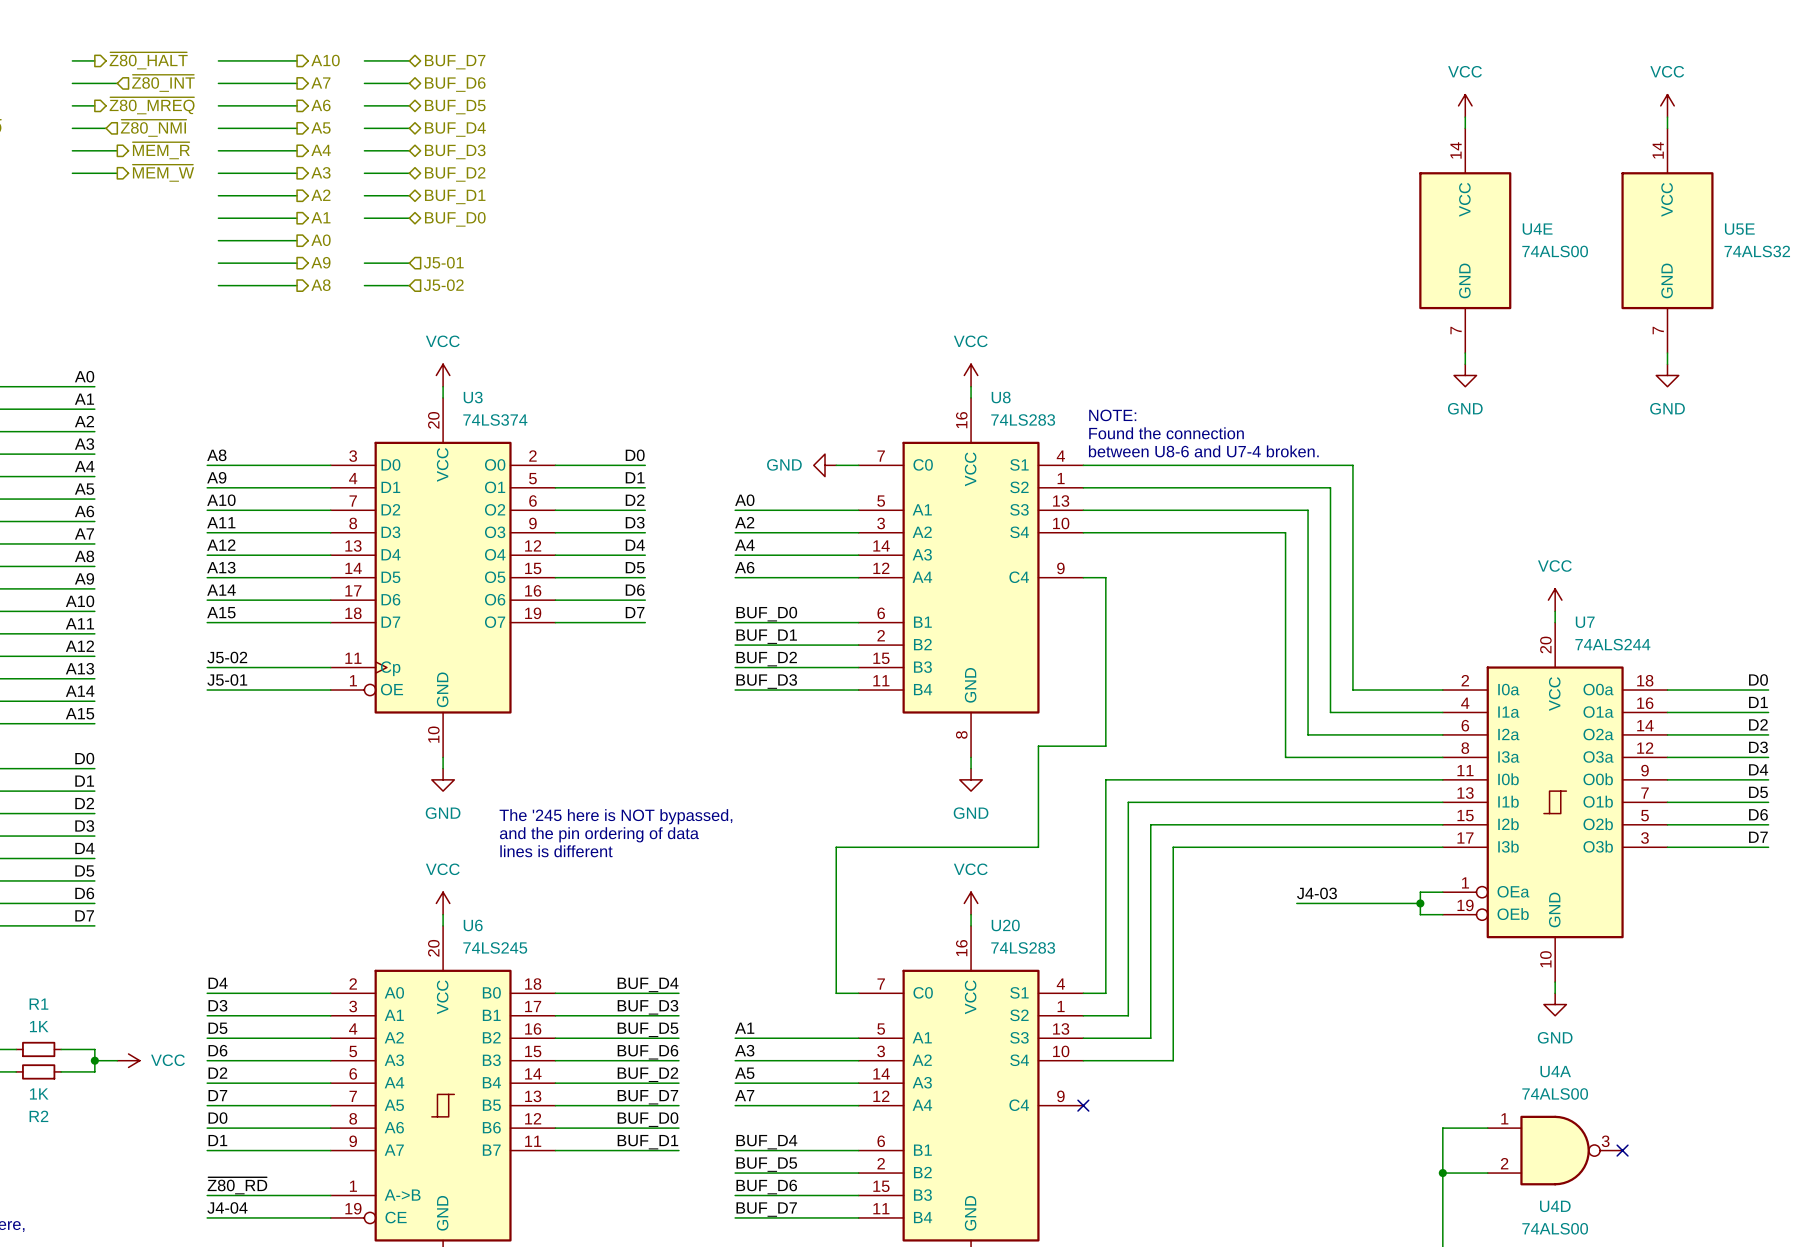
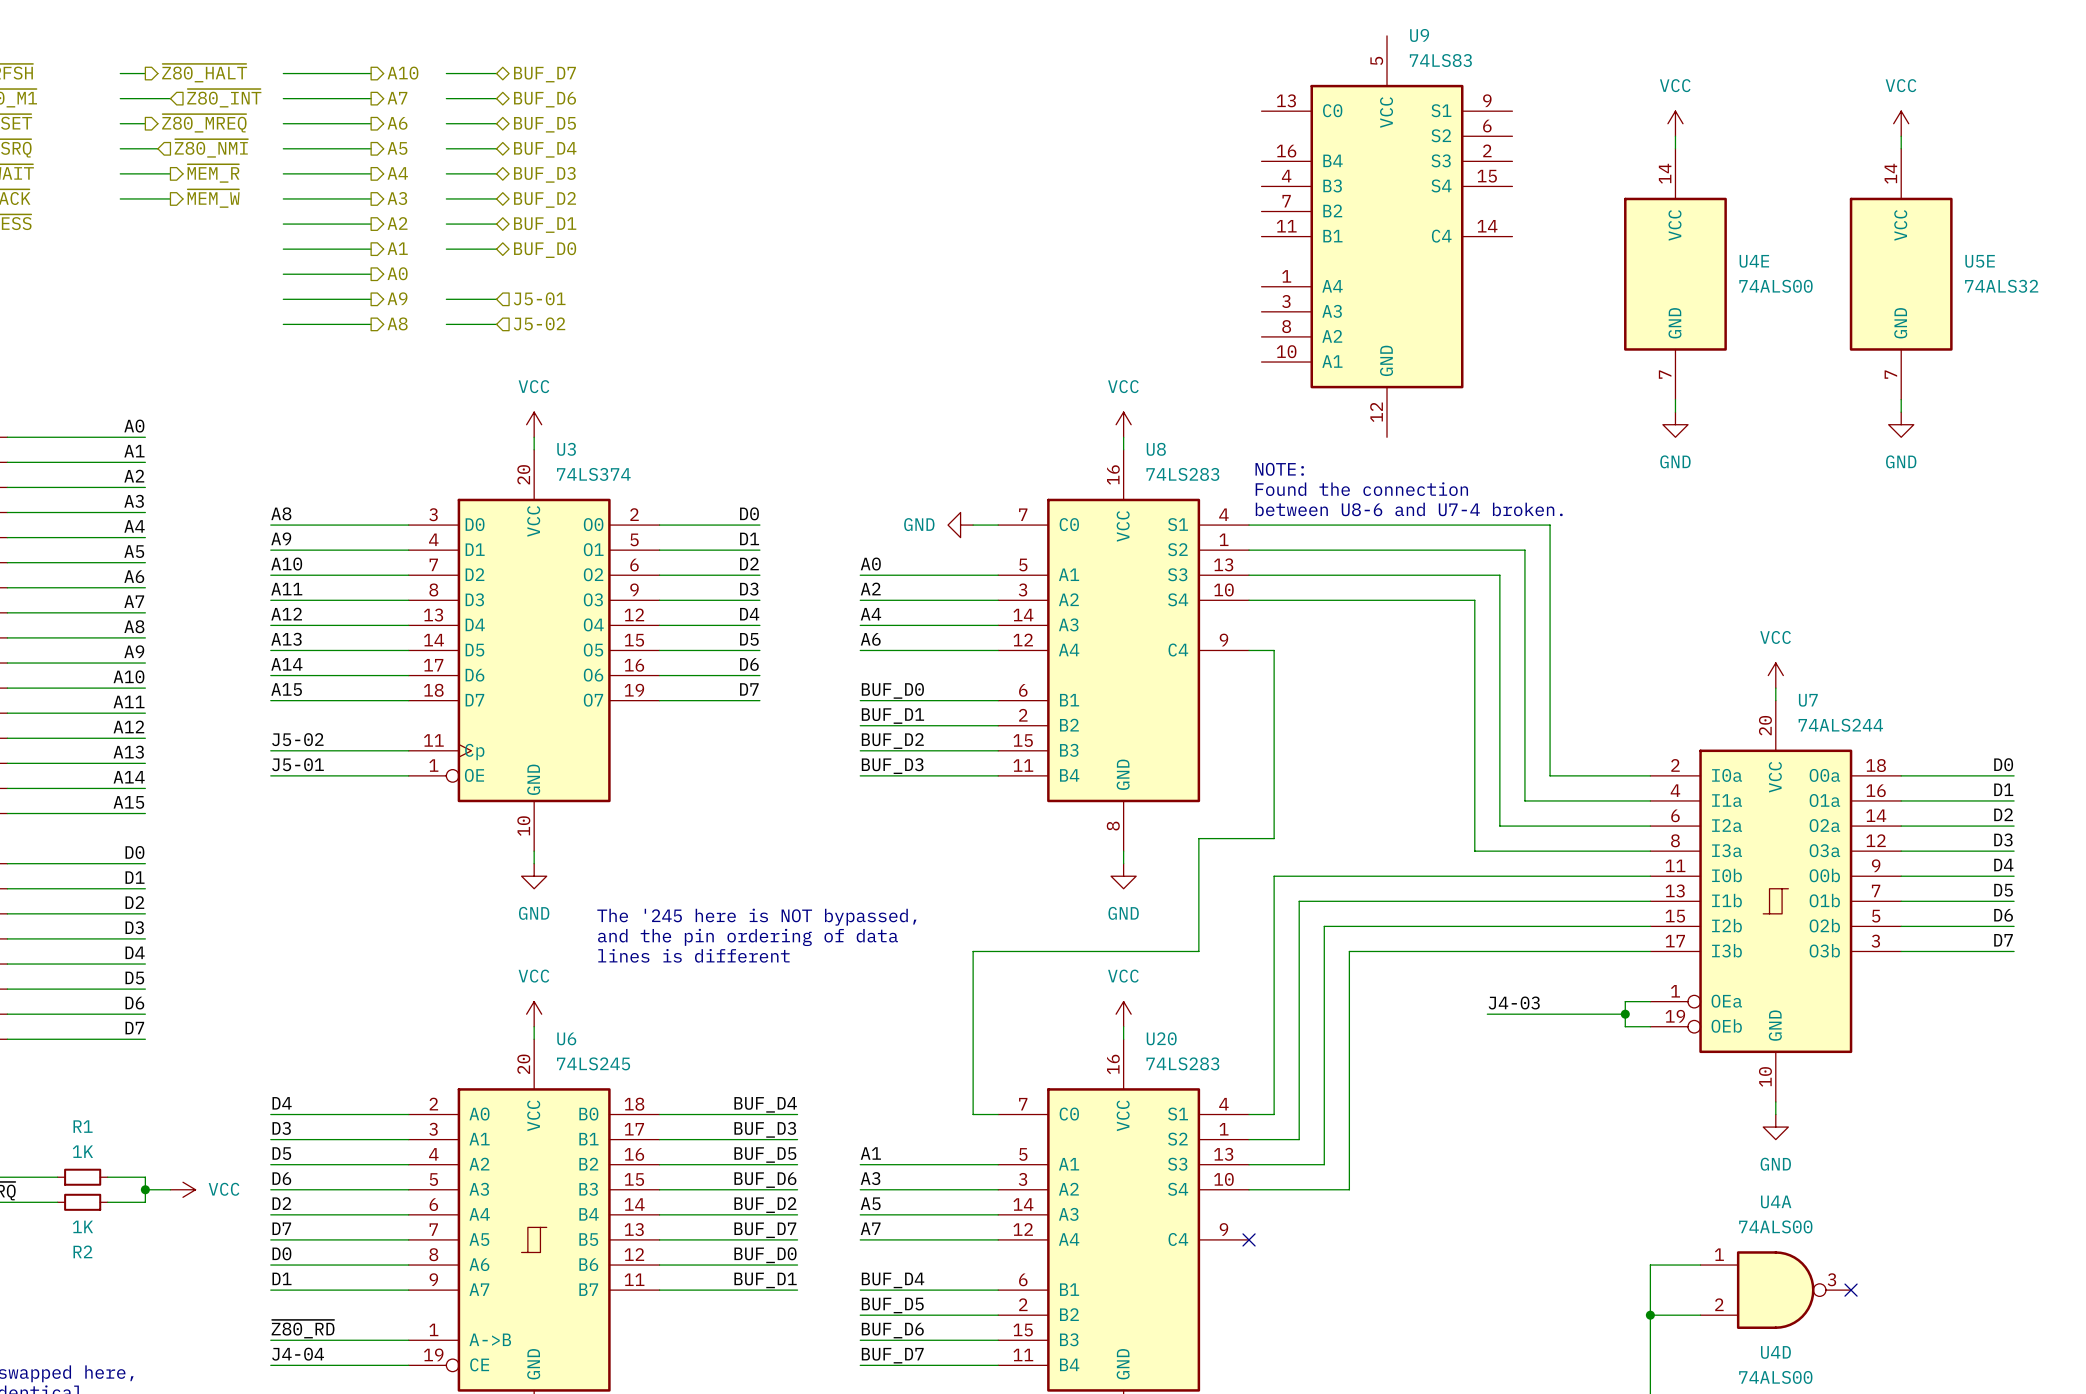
U9: none -> 74LS83 (1387, 236)

